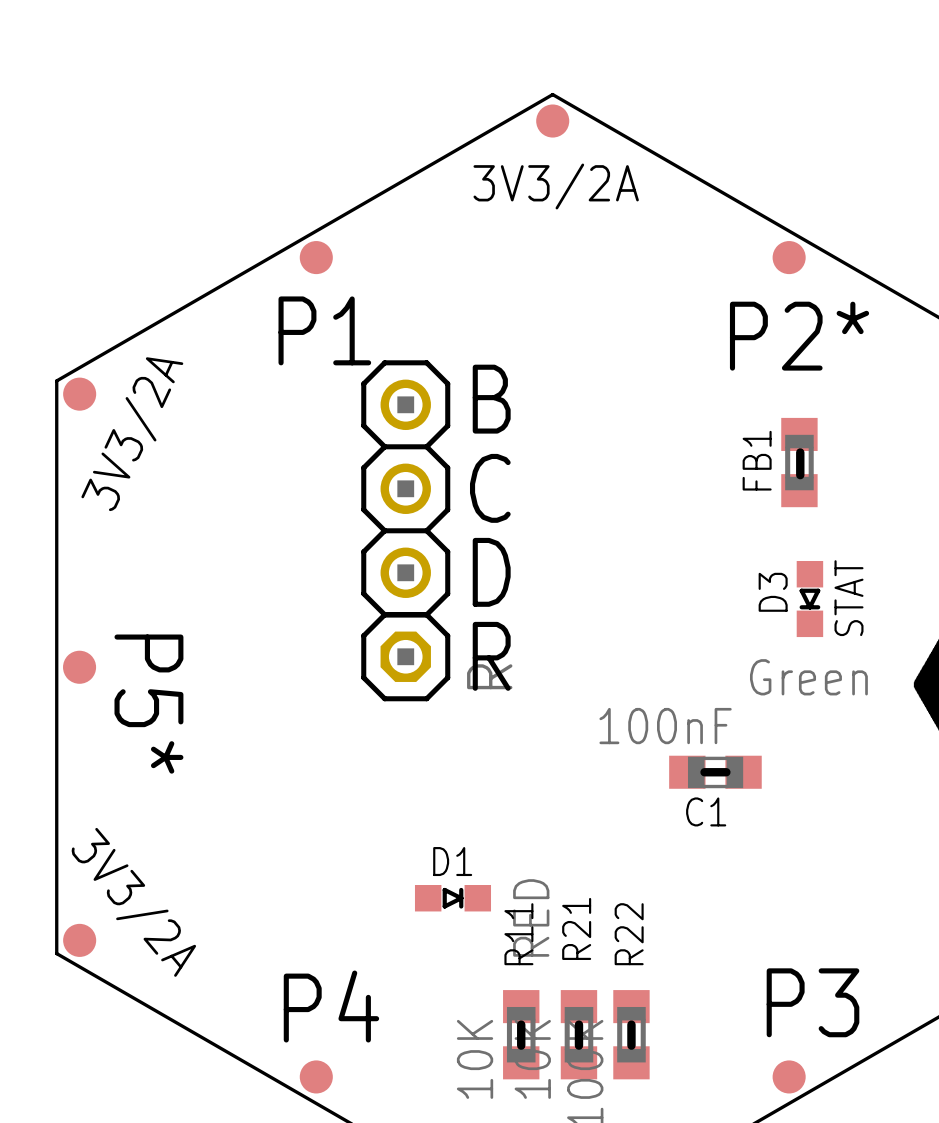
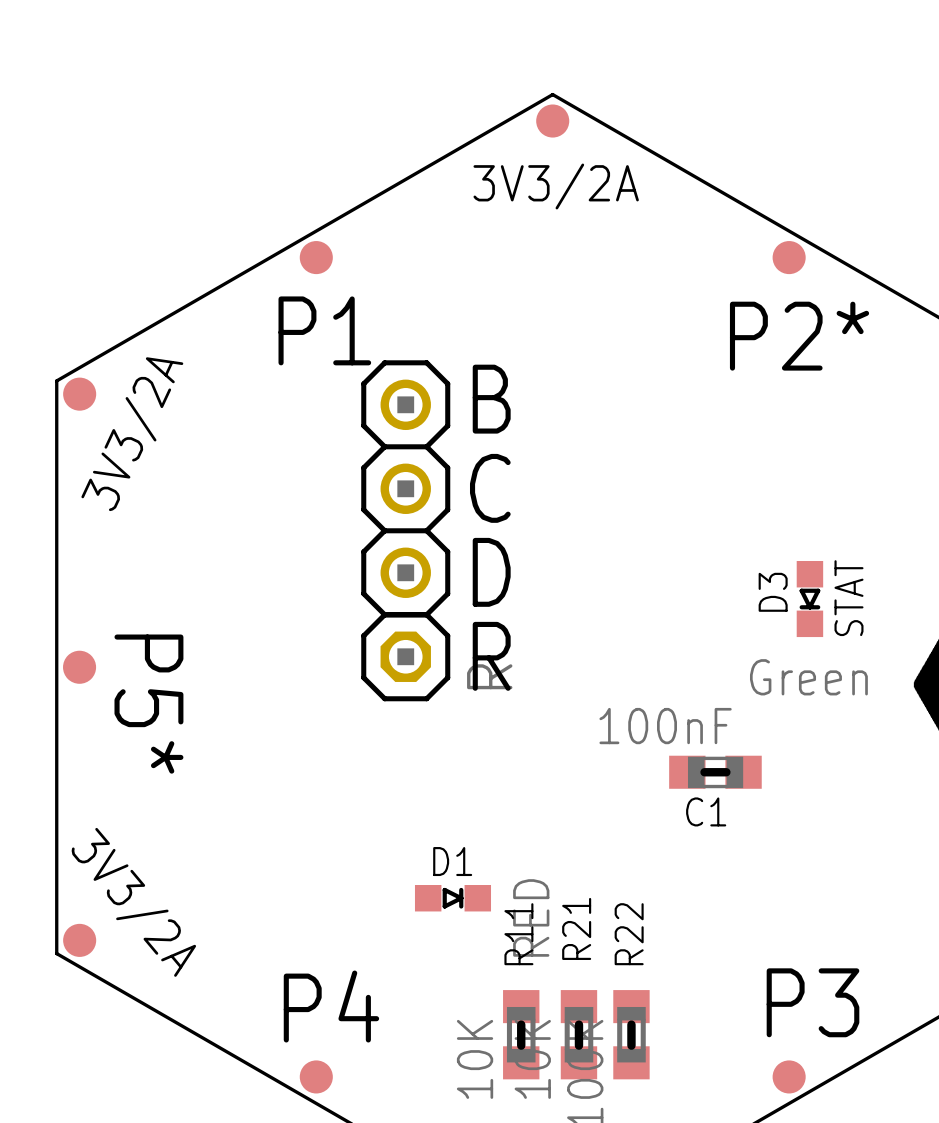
FB1: (799, 462) -> none

